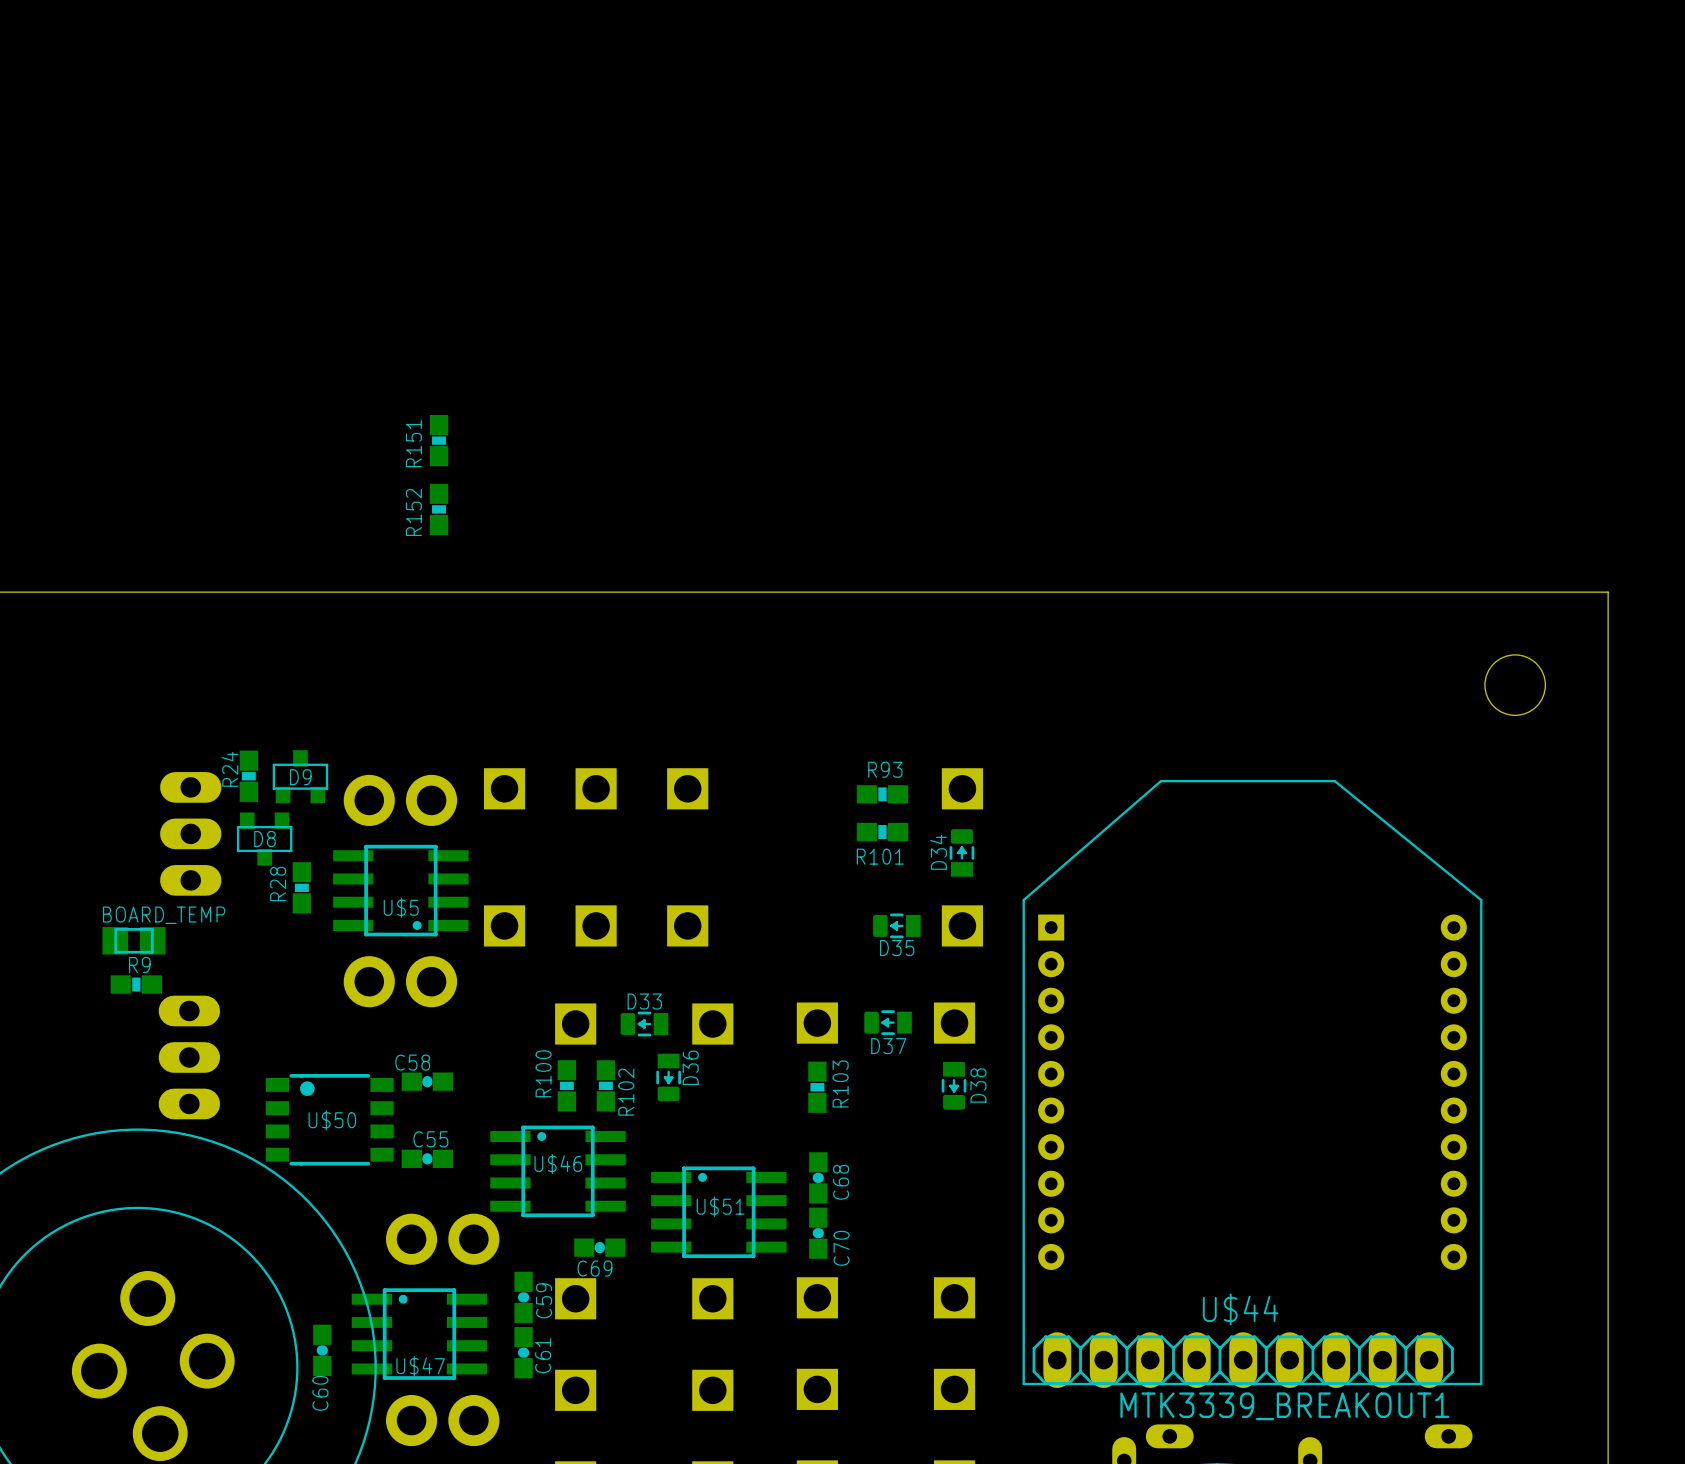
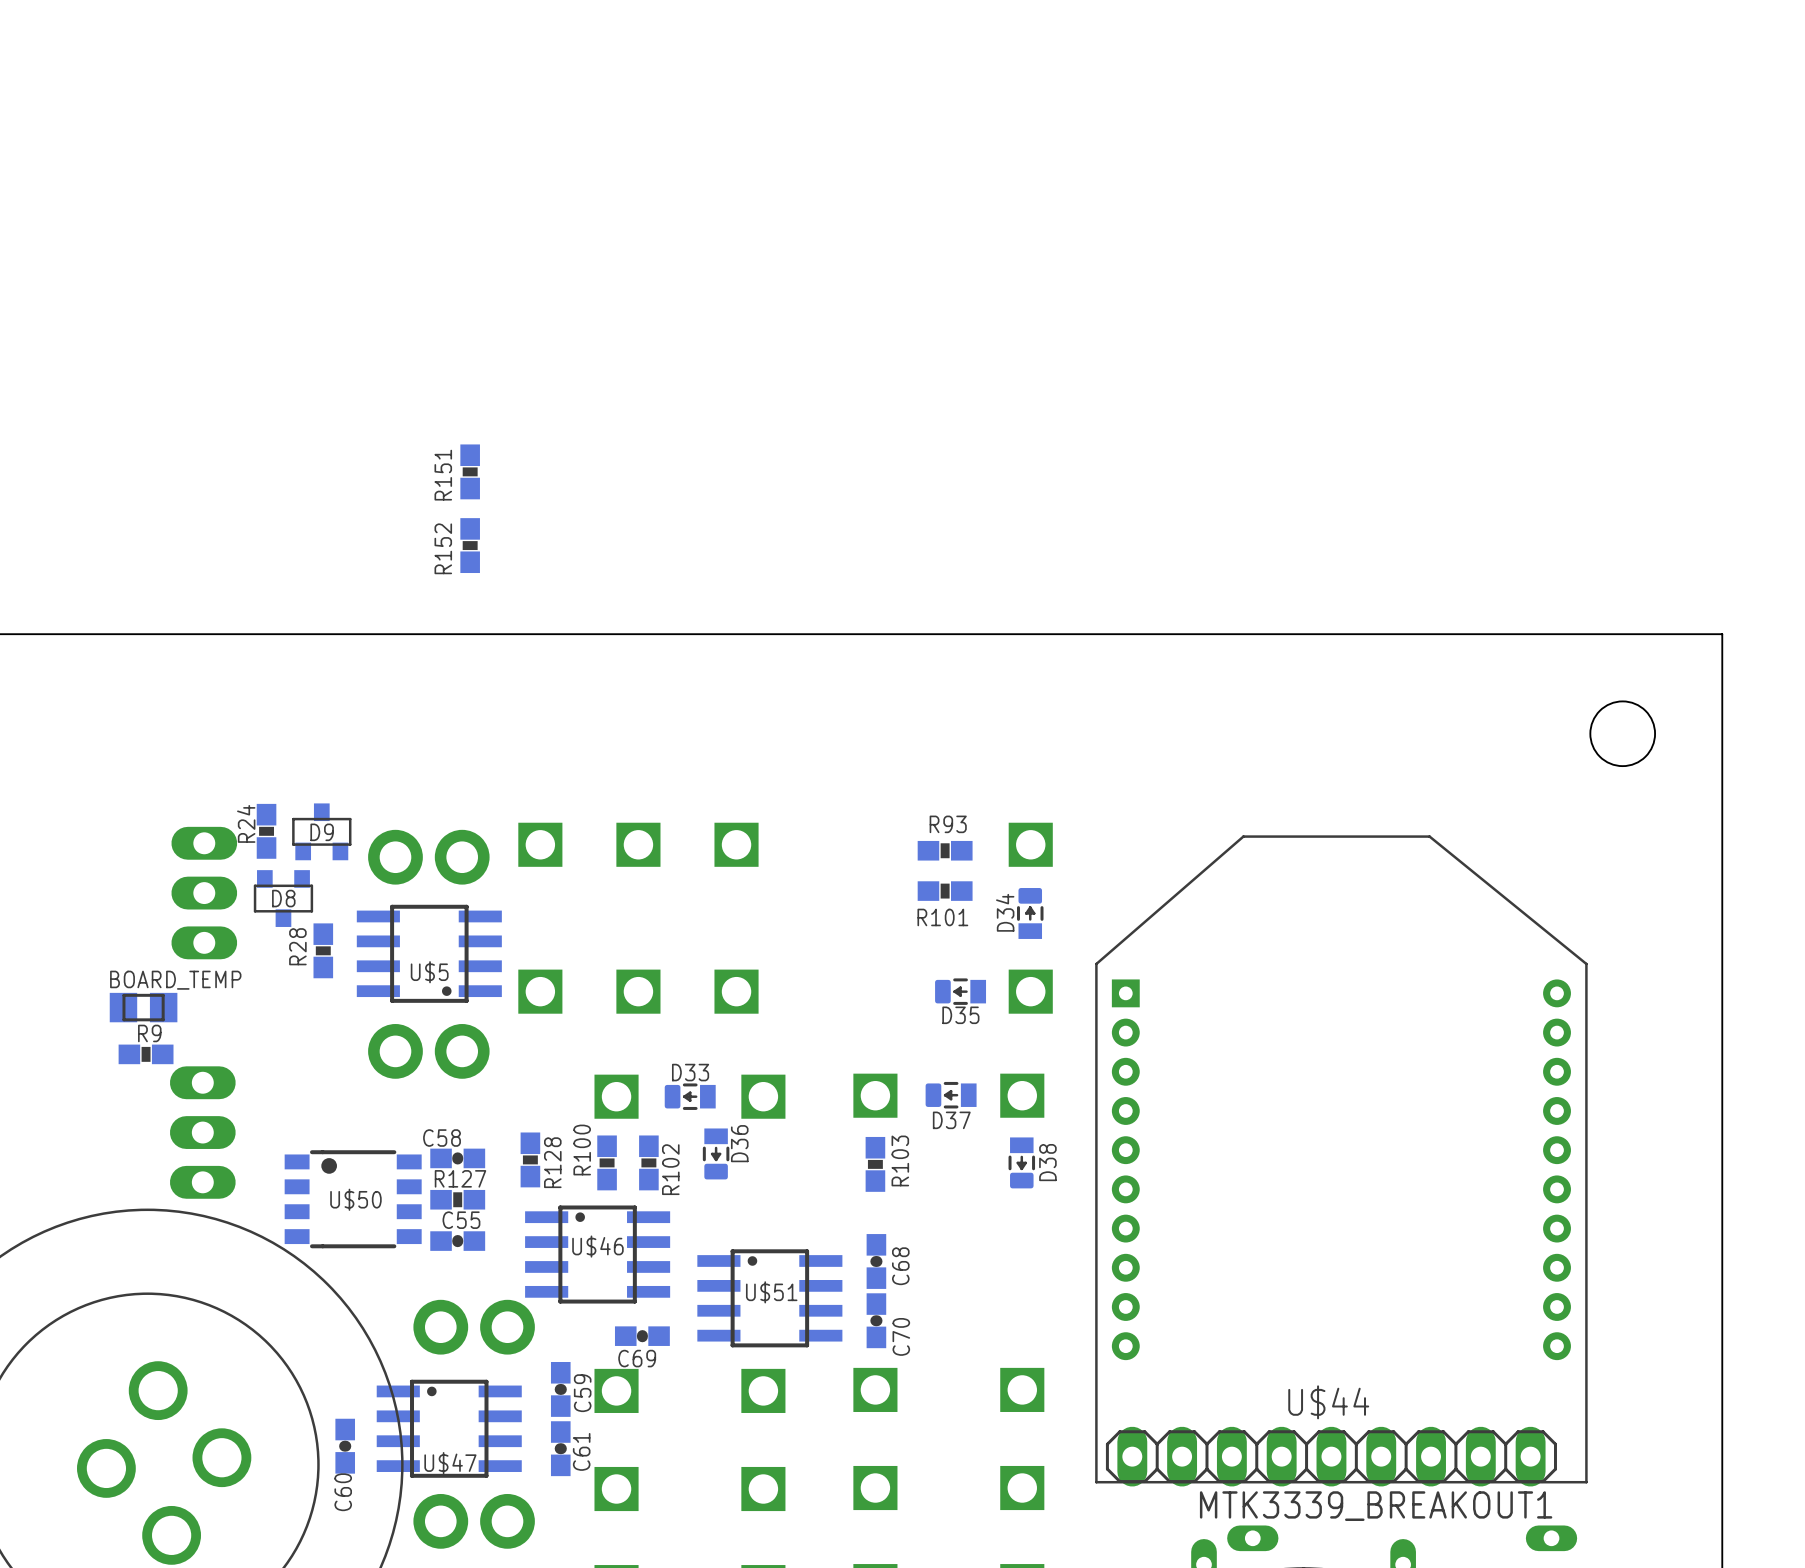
R128: none -> (530, 1159)
R127: none -> (457, 1199)

